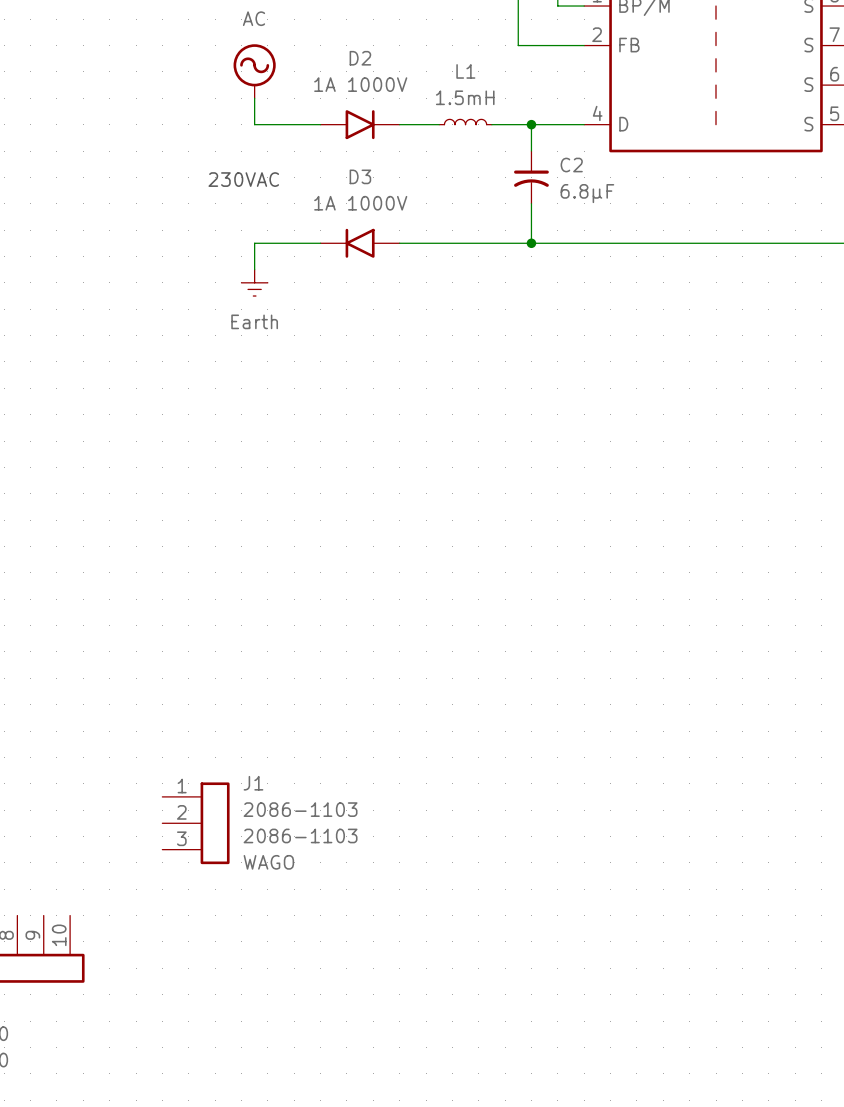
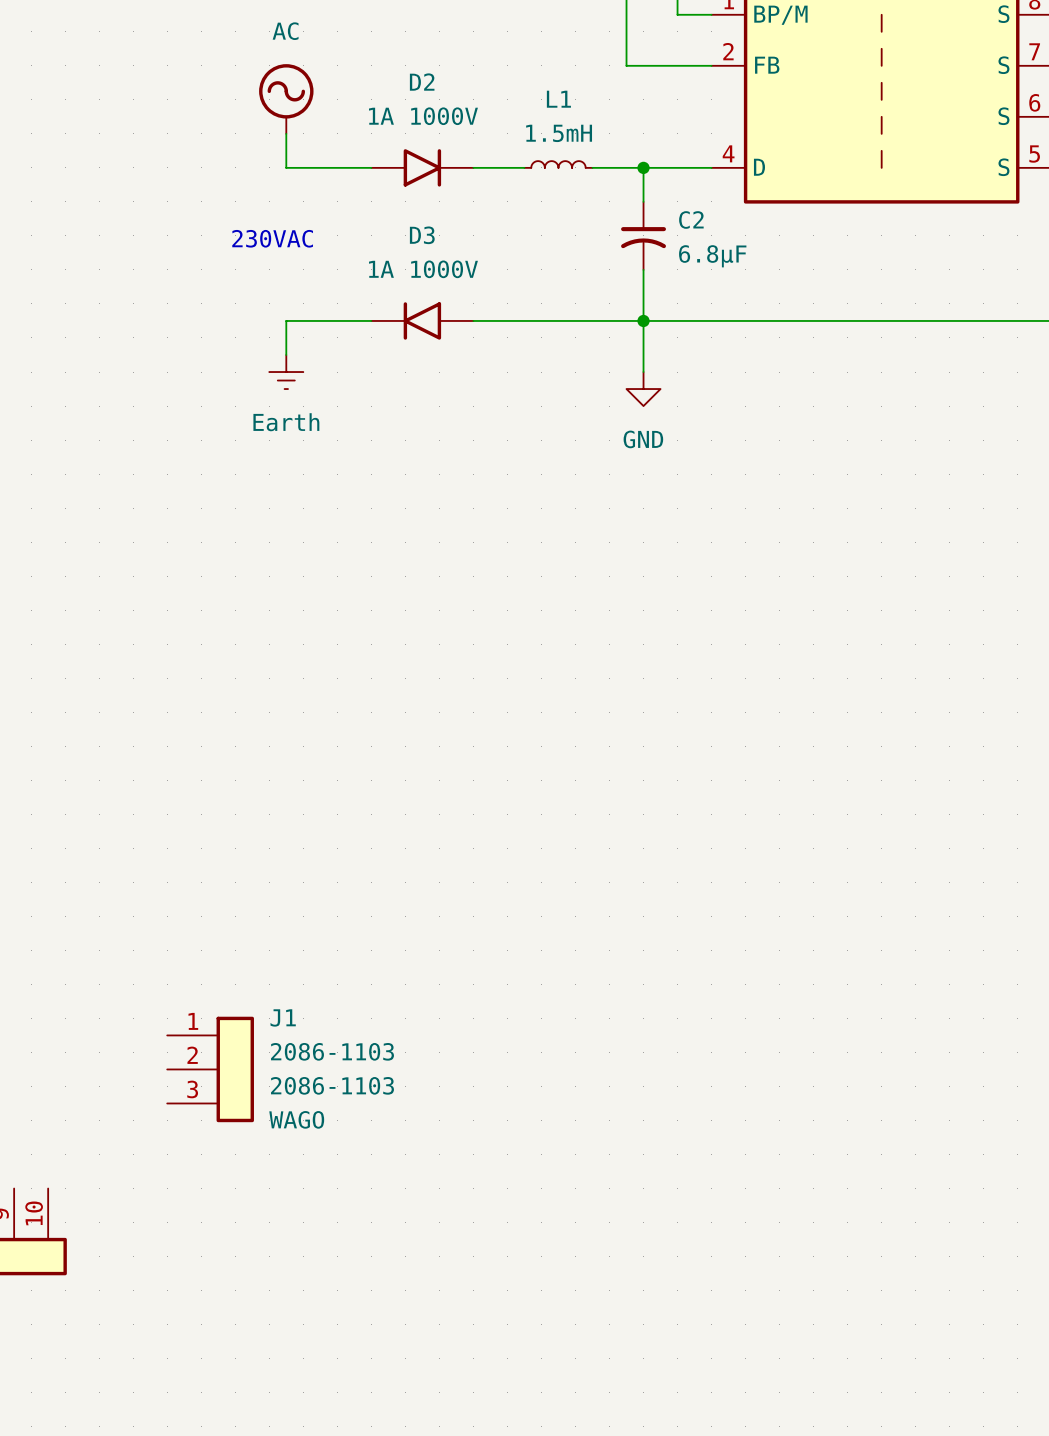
wire: none -> (643, 320) (643, 372)
power symbol: none -> GND (643, 389)

